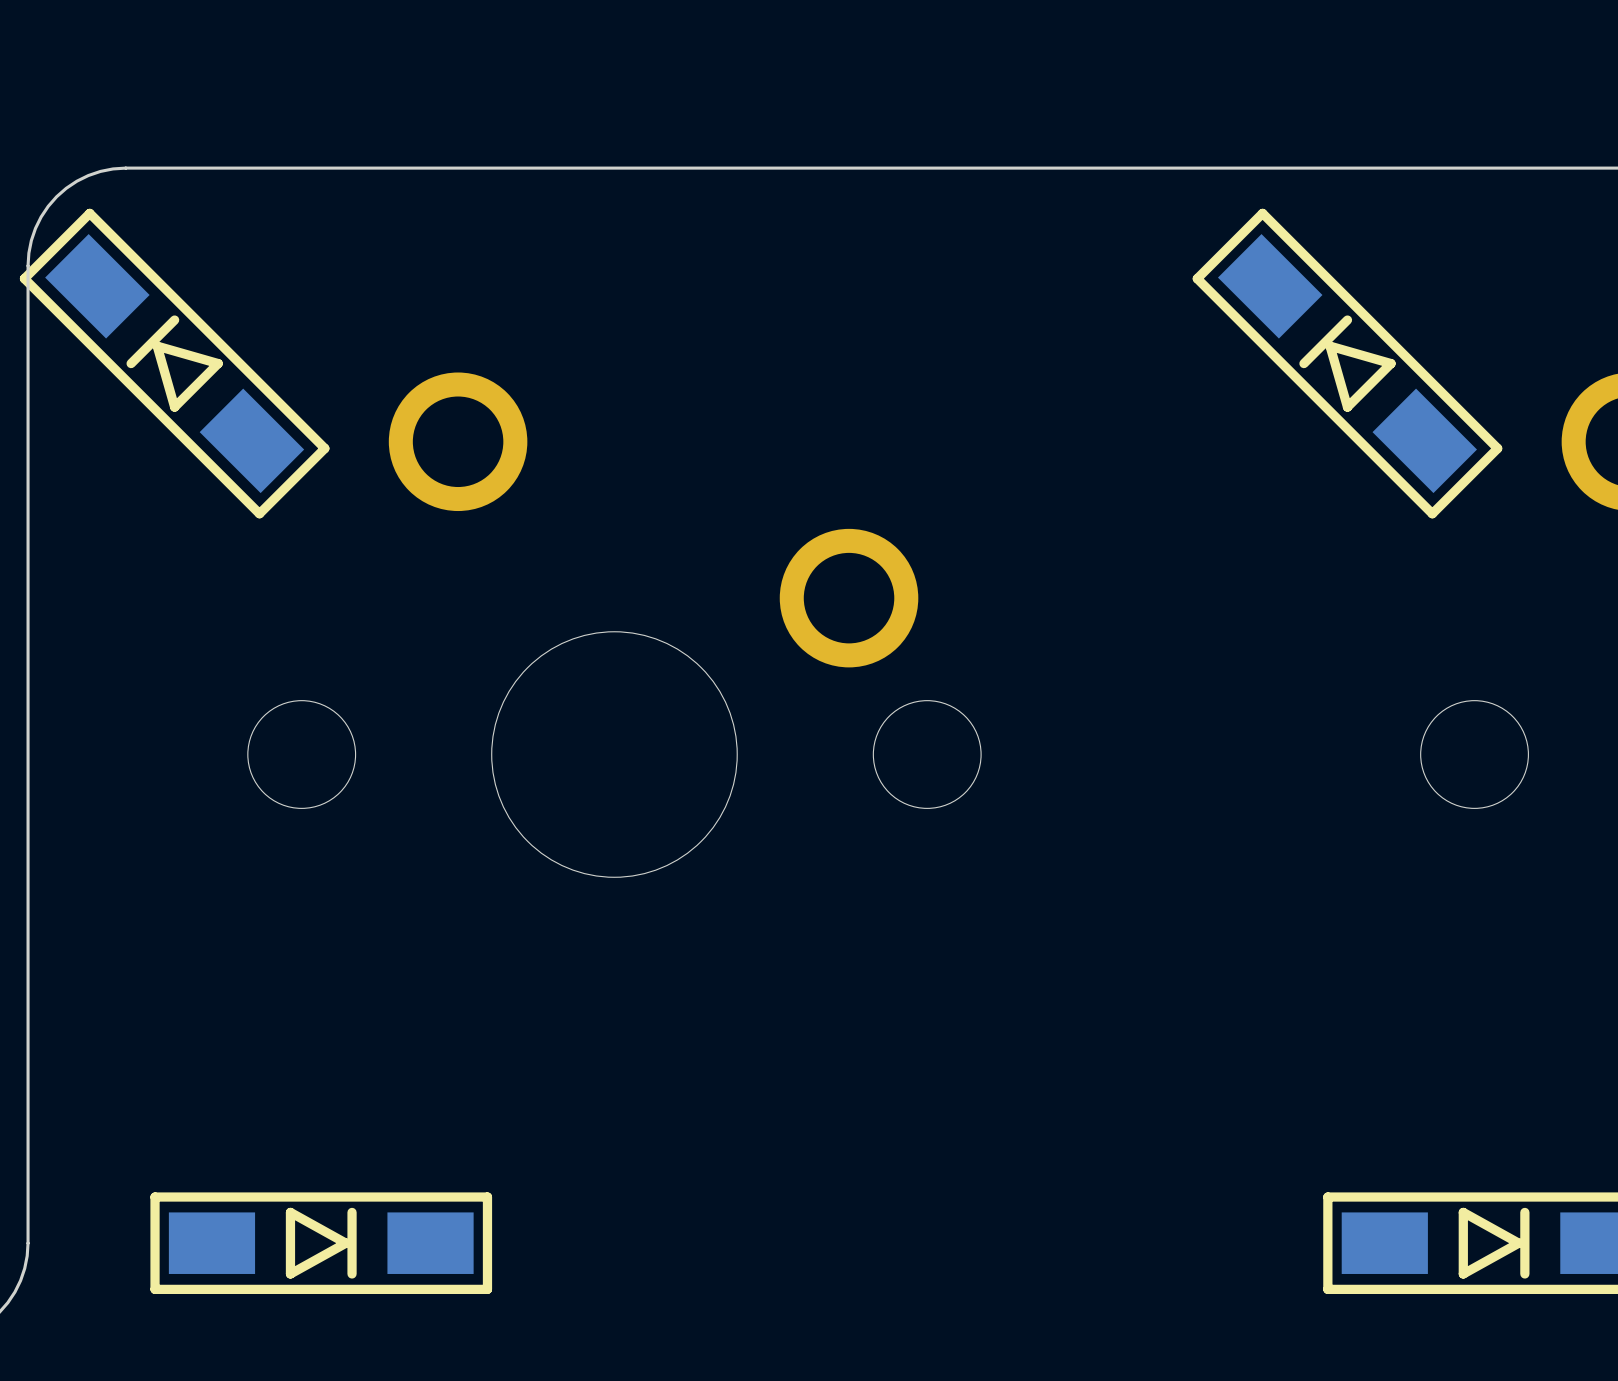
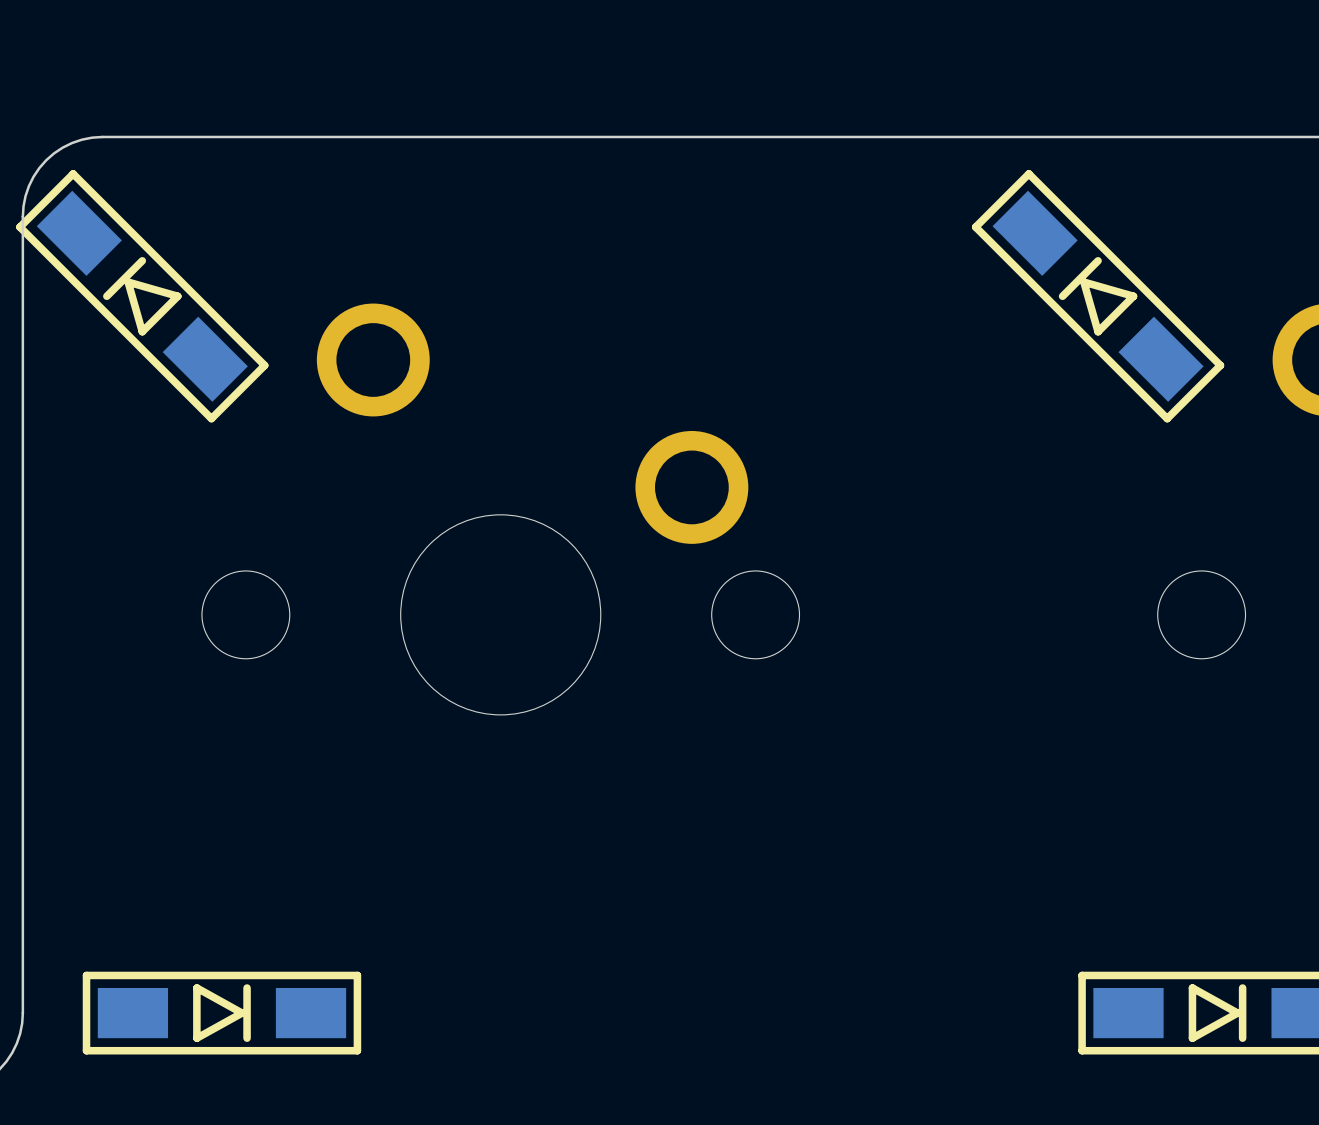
part position: (321, 1243) -> (221, 1013)

